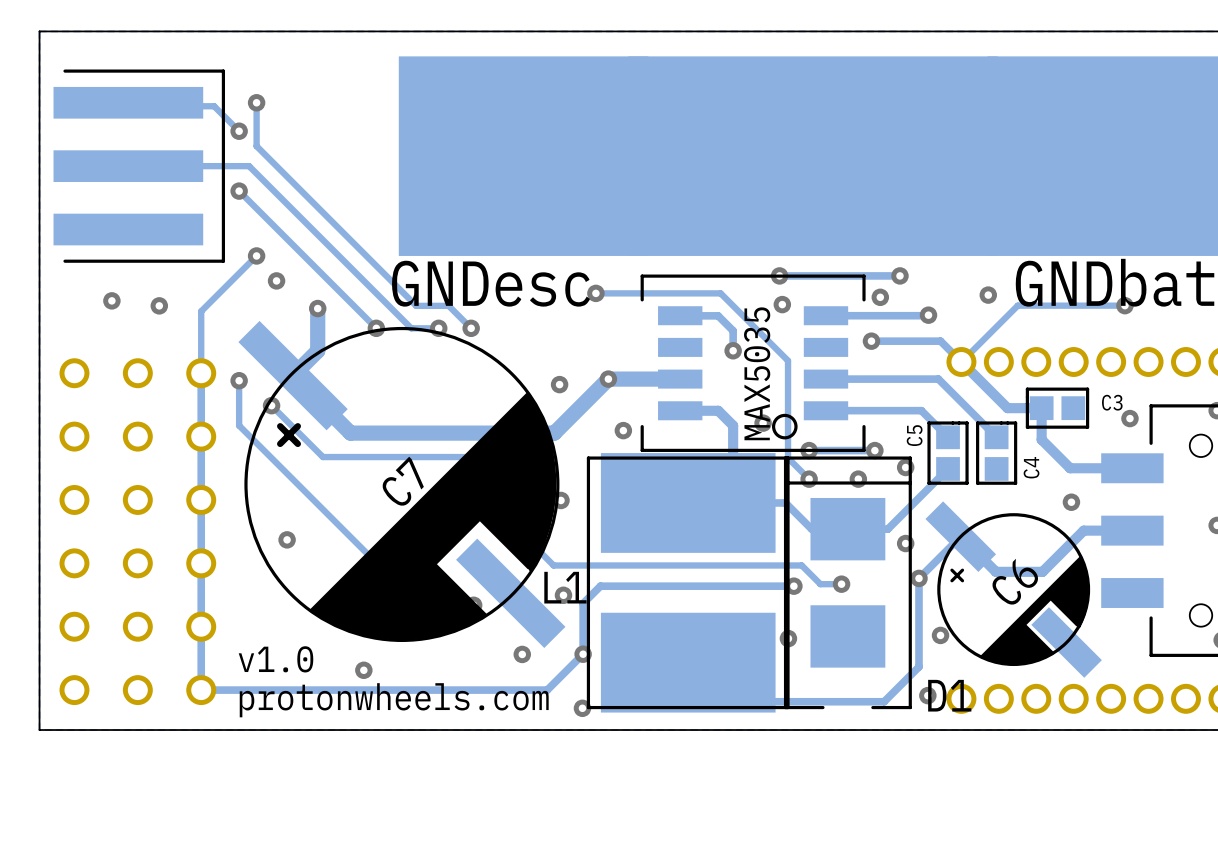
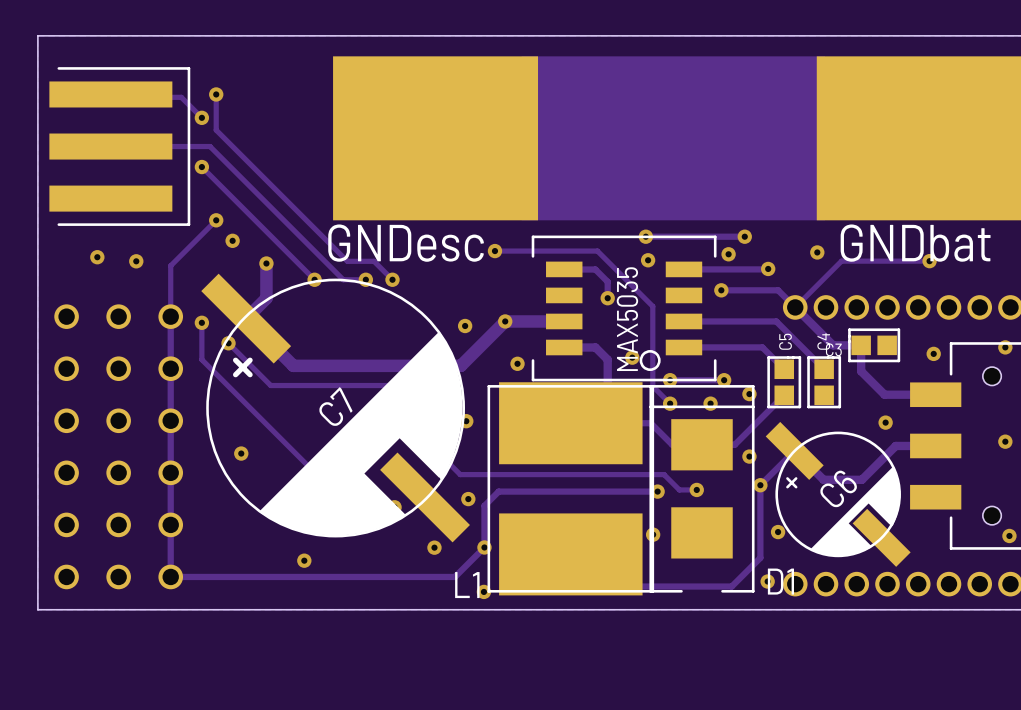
C3 name position: C3 (1112, 402) -> C3 (833, 349)
C5 name position: C5 (914, 435) -> C5 (785, 341)
C4 name position: C4 (1031, 467) -> C4 (823, 341)
L1 name position: L1 (565, 587) -> L1 (467, 585)
text: v1.0 (276, 659) -> none
text: protonwheels.com (394, 700) -> none

